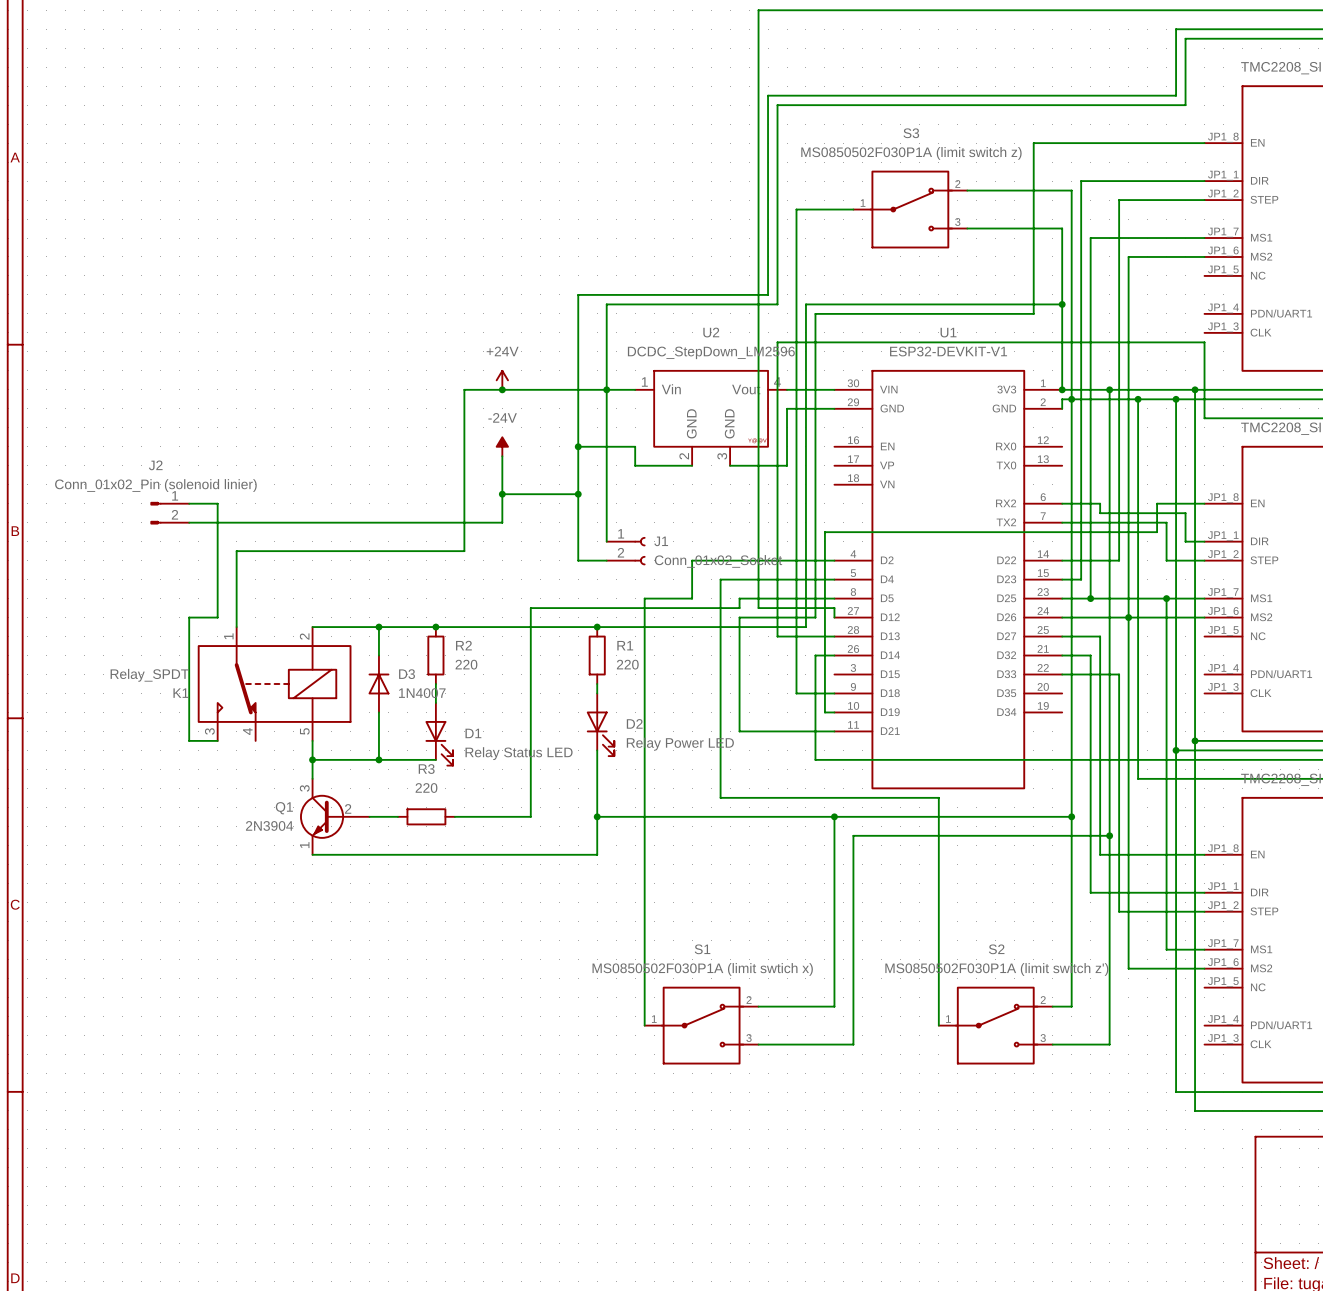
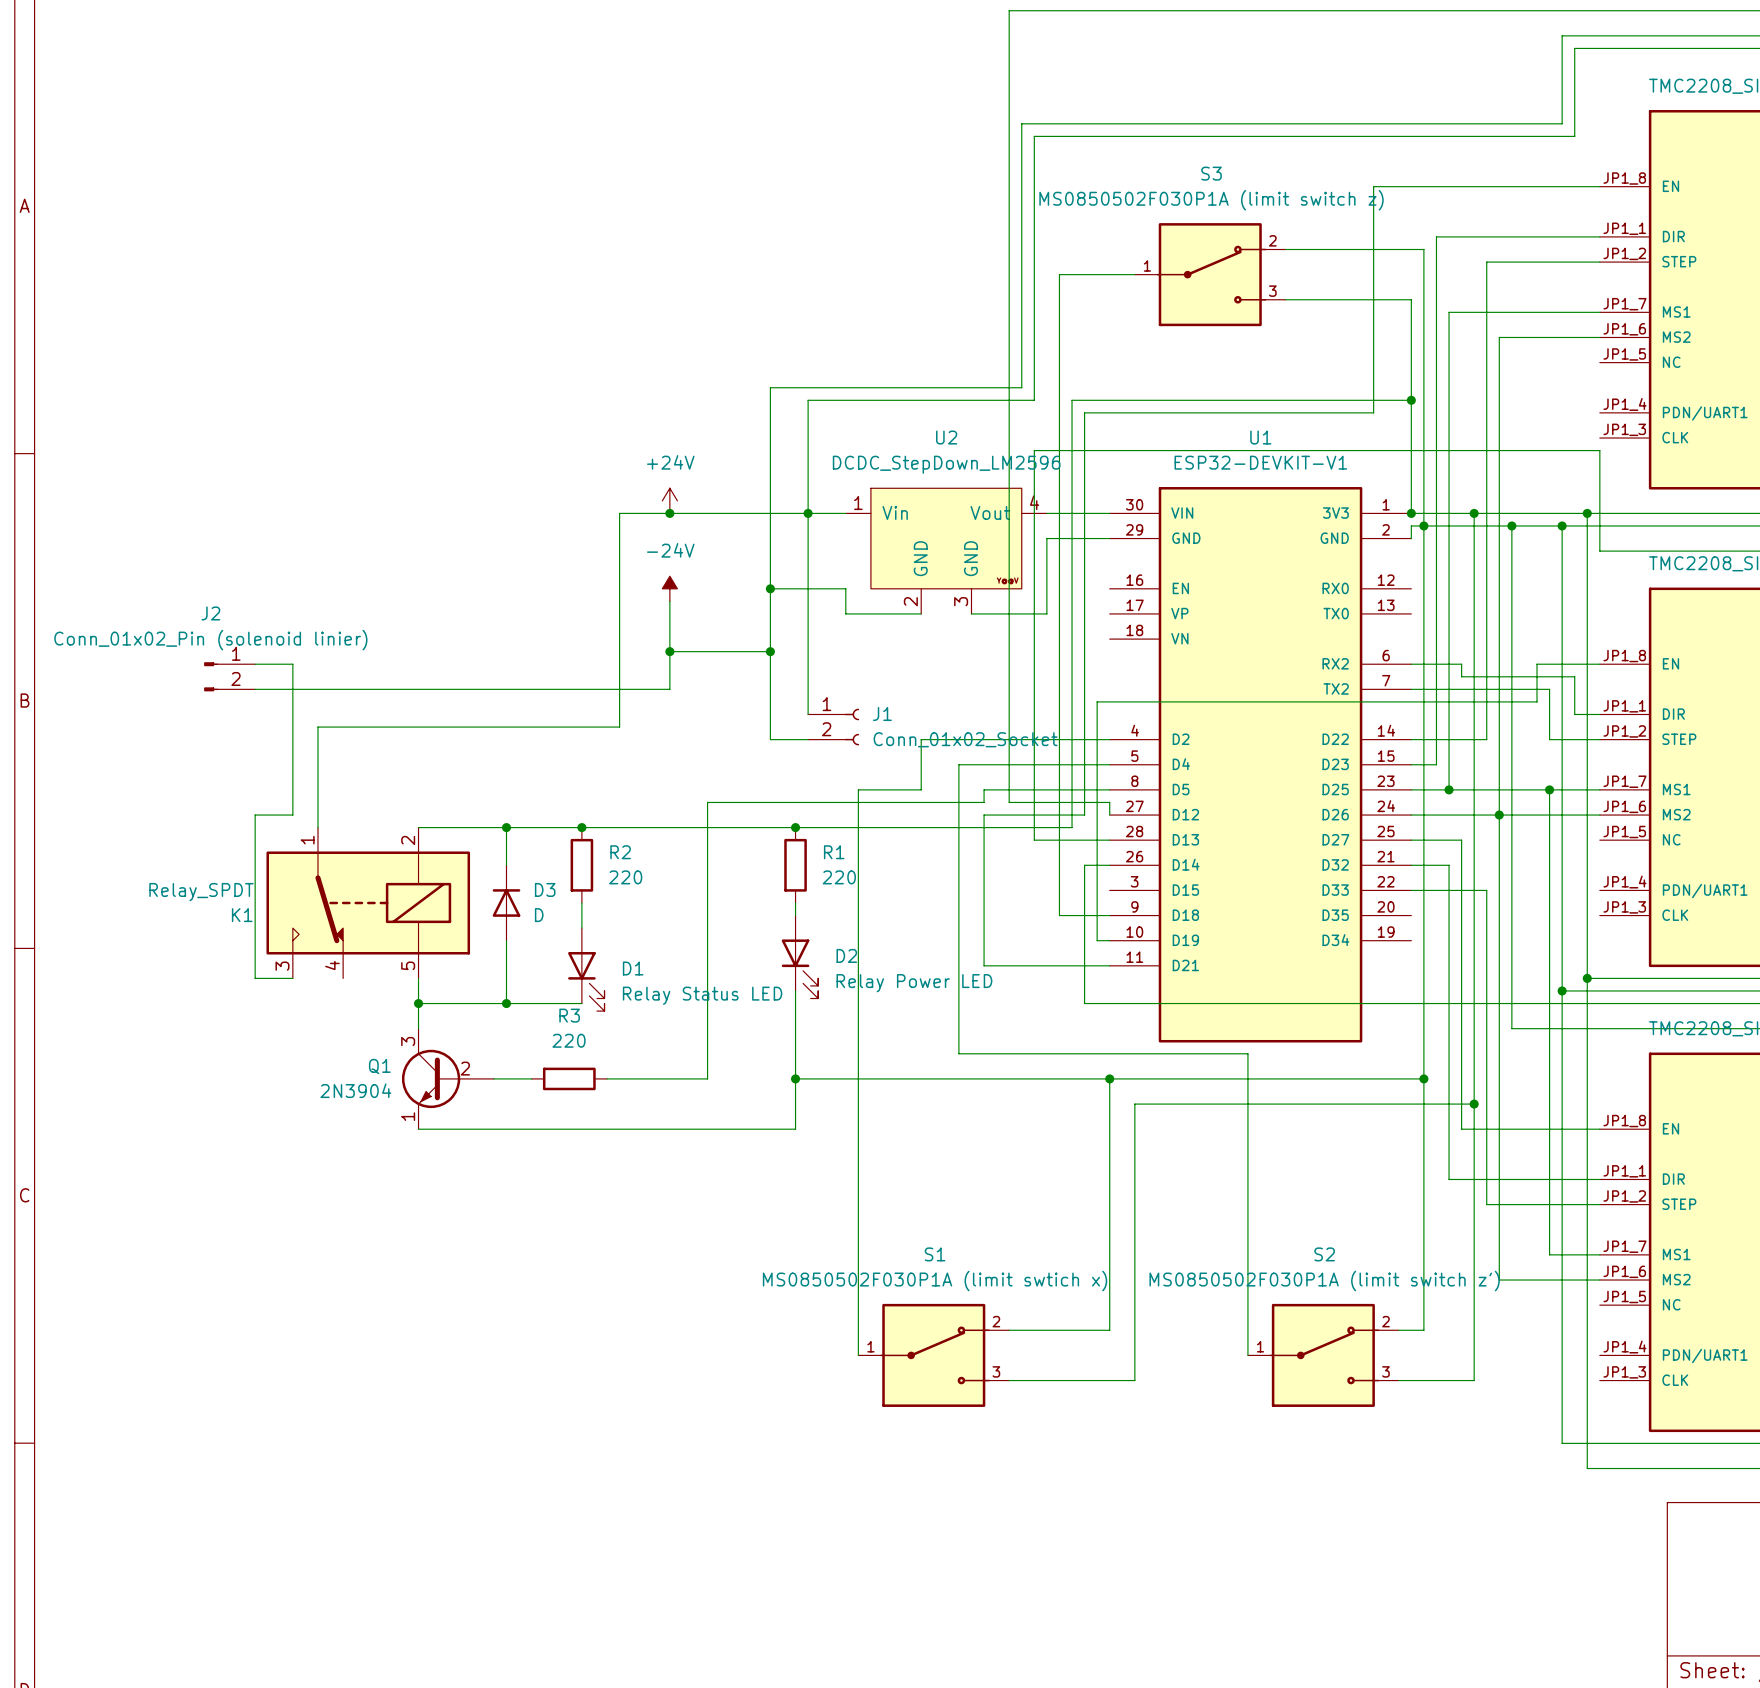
D3 value: 1N4007 (422, 693) -> D (539, 915)

